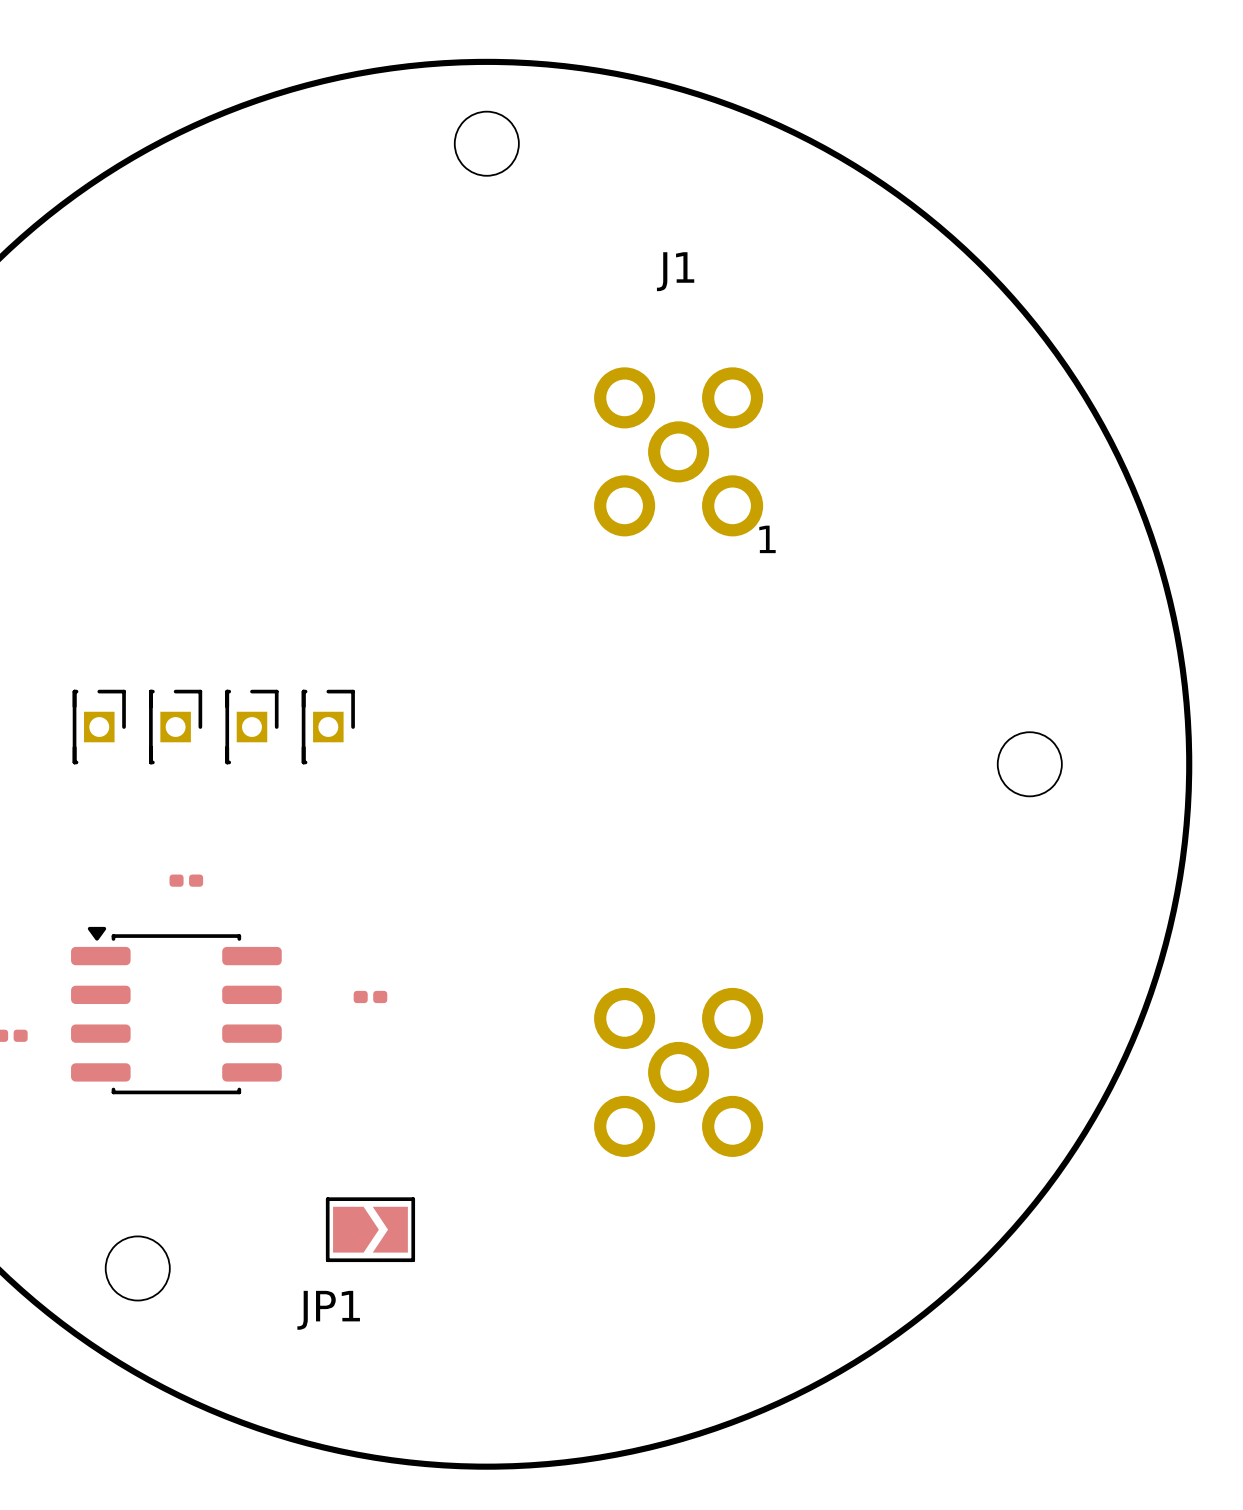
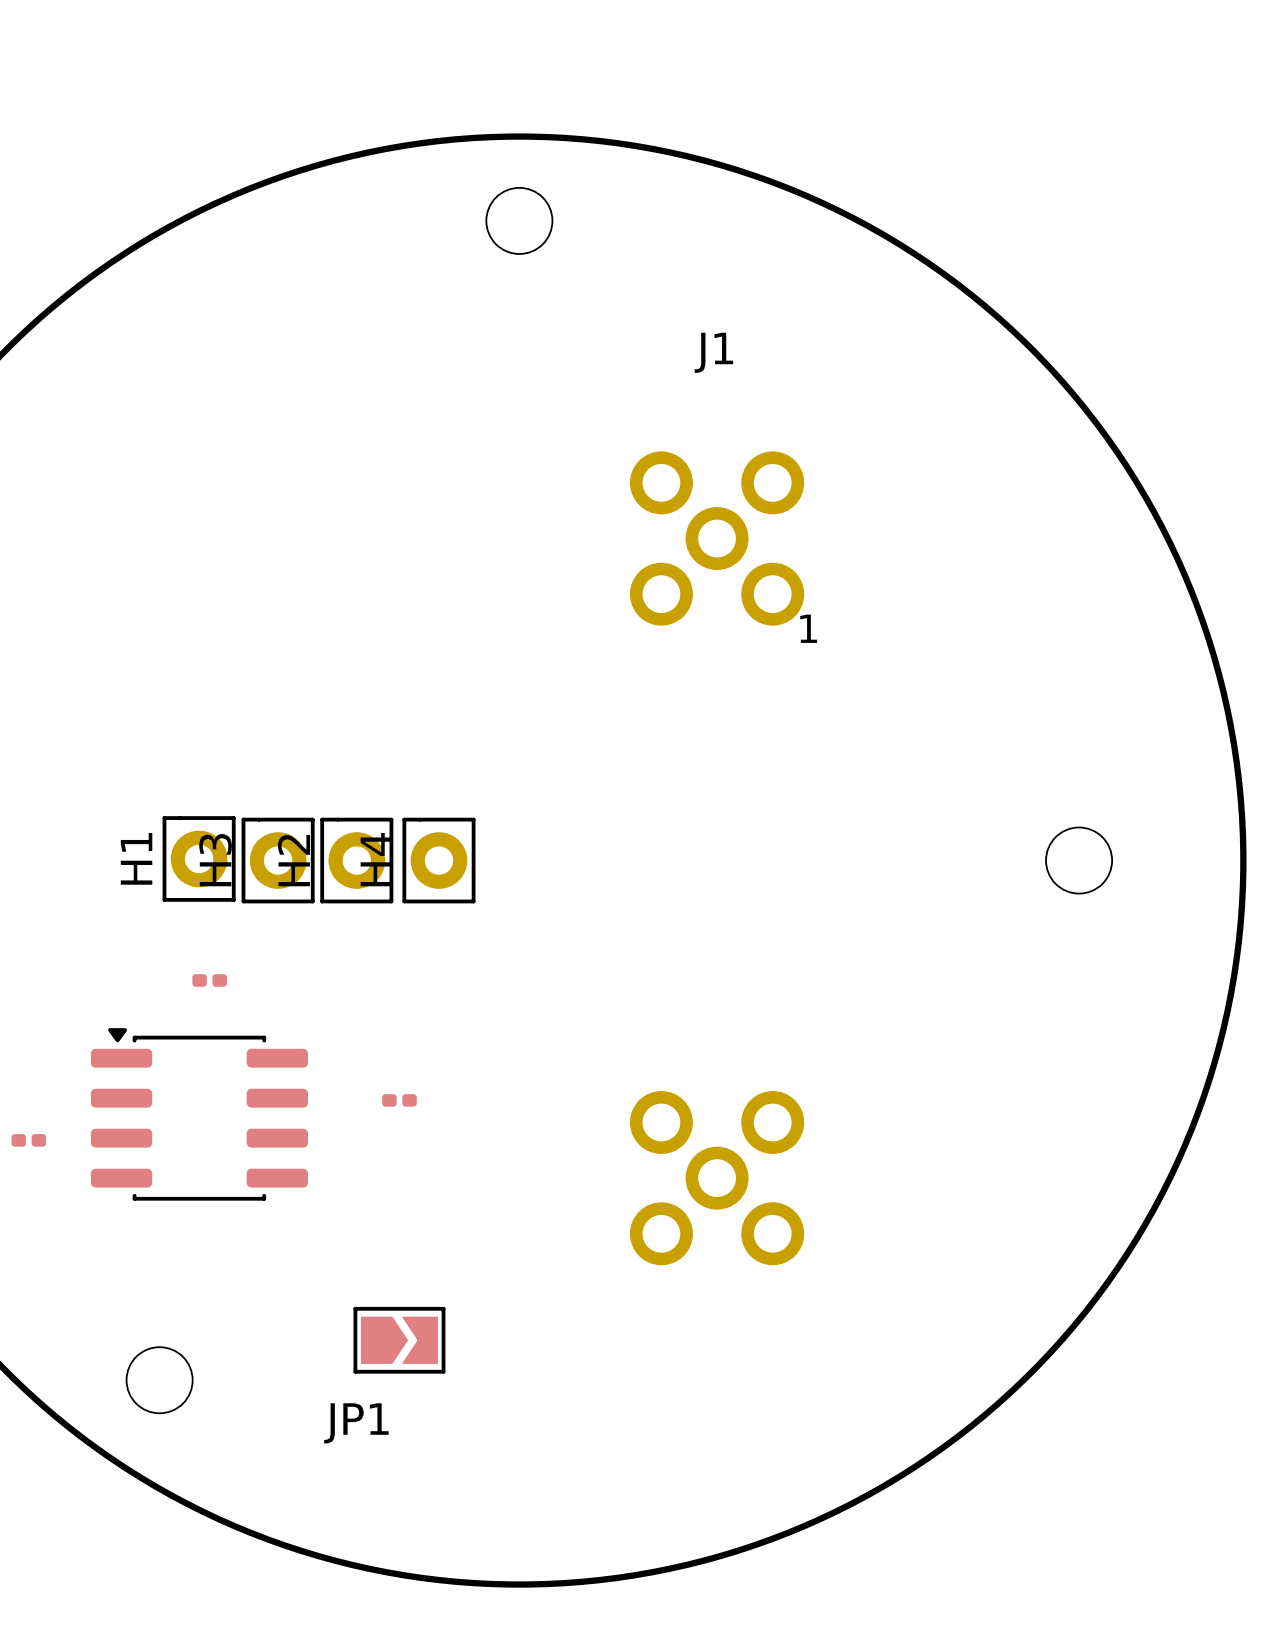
part: (99, 727) -> none
part: (175, 727) -> none
part: (251, 727) -> none
part: (328, 727) -> none
H1: none -> (199, 858)
H3: none -> (278, 860)
H2: none -> (356, 860)
H4: none -> (438, 860)

